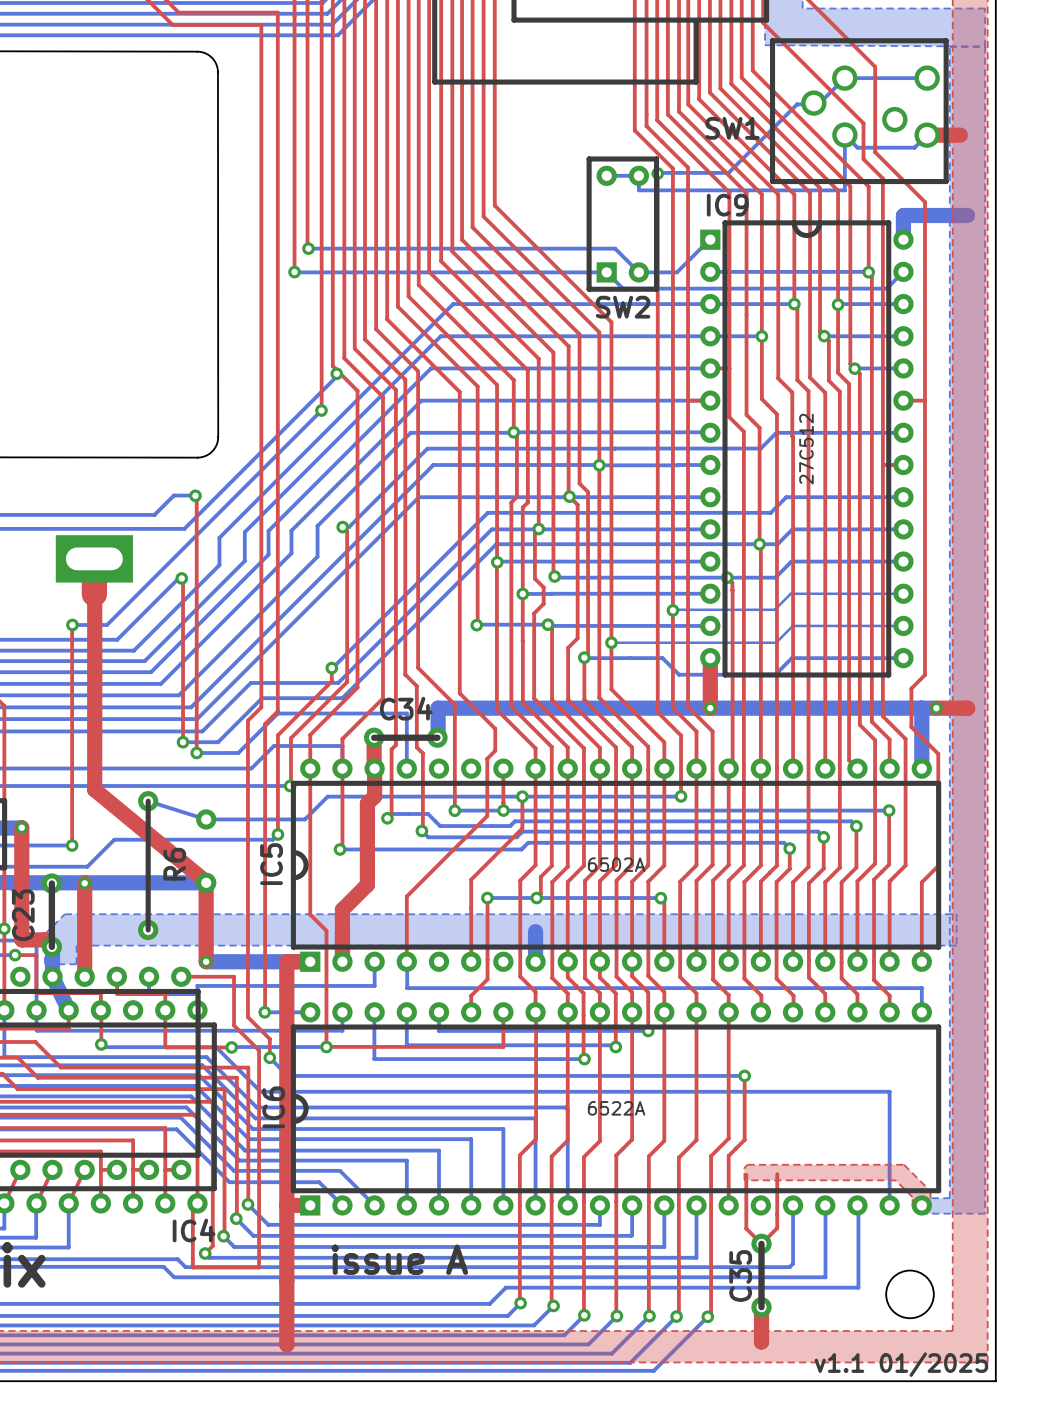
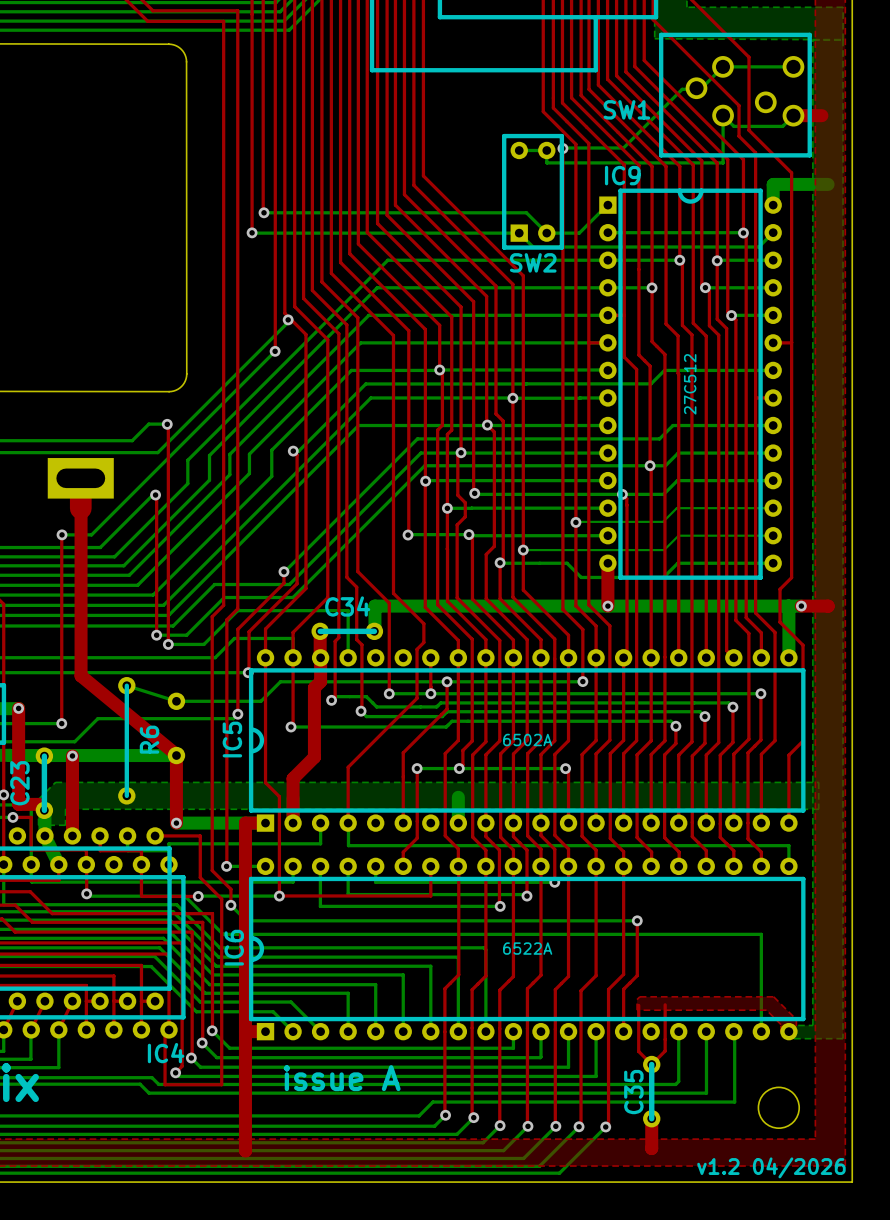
text: v1.1 01/2025 (901, 1364) -> v1.2 04/2026 (771, 1167)

